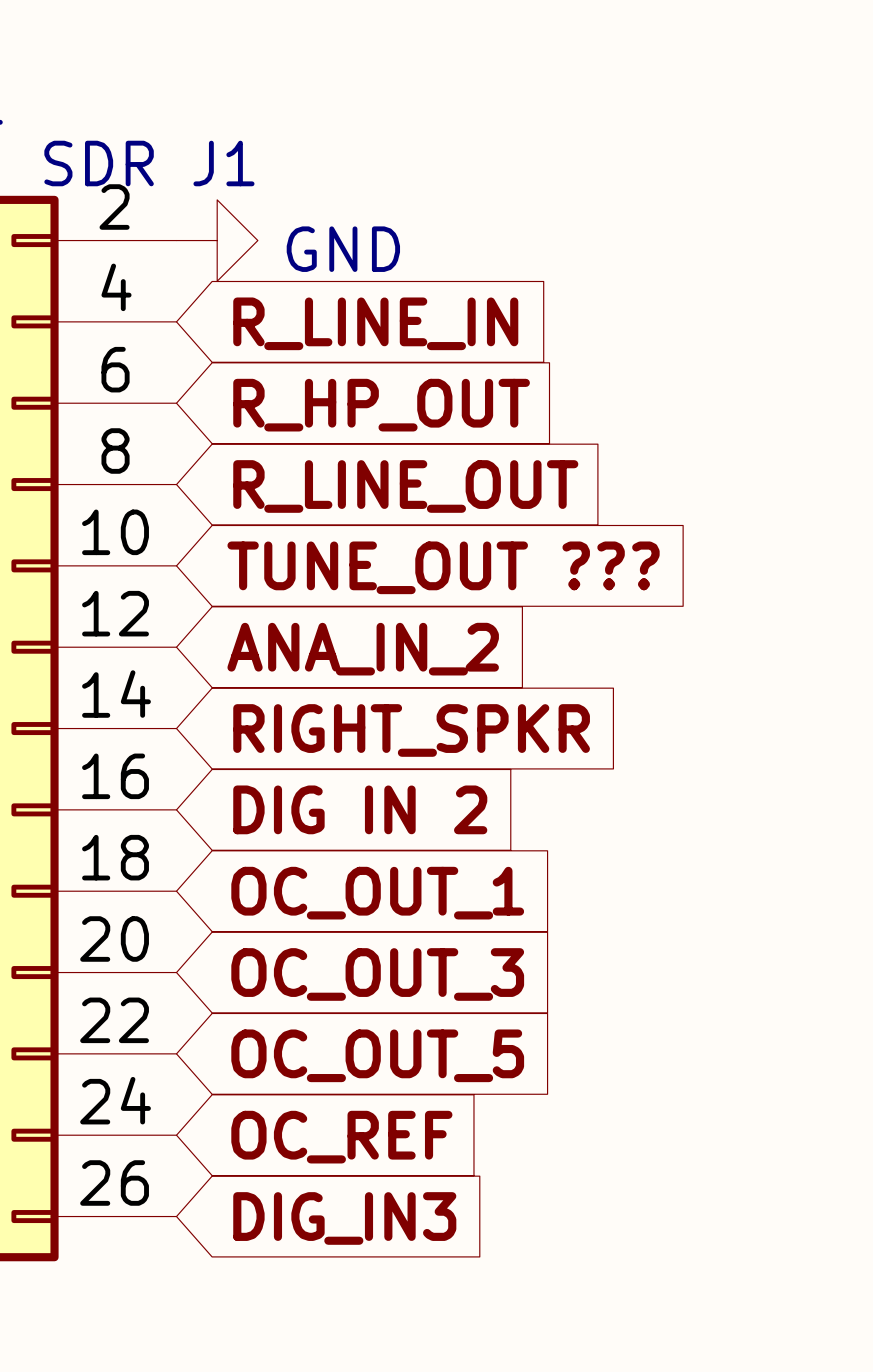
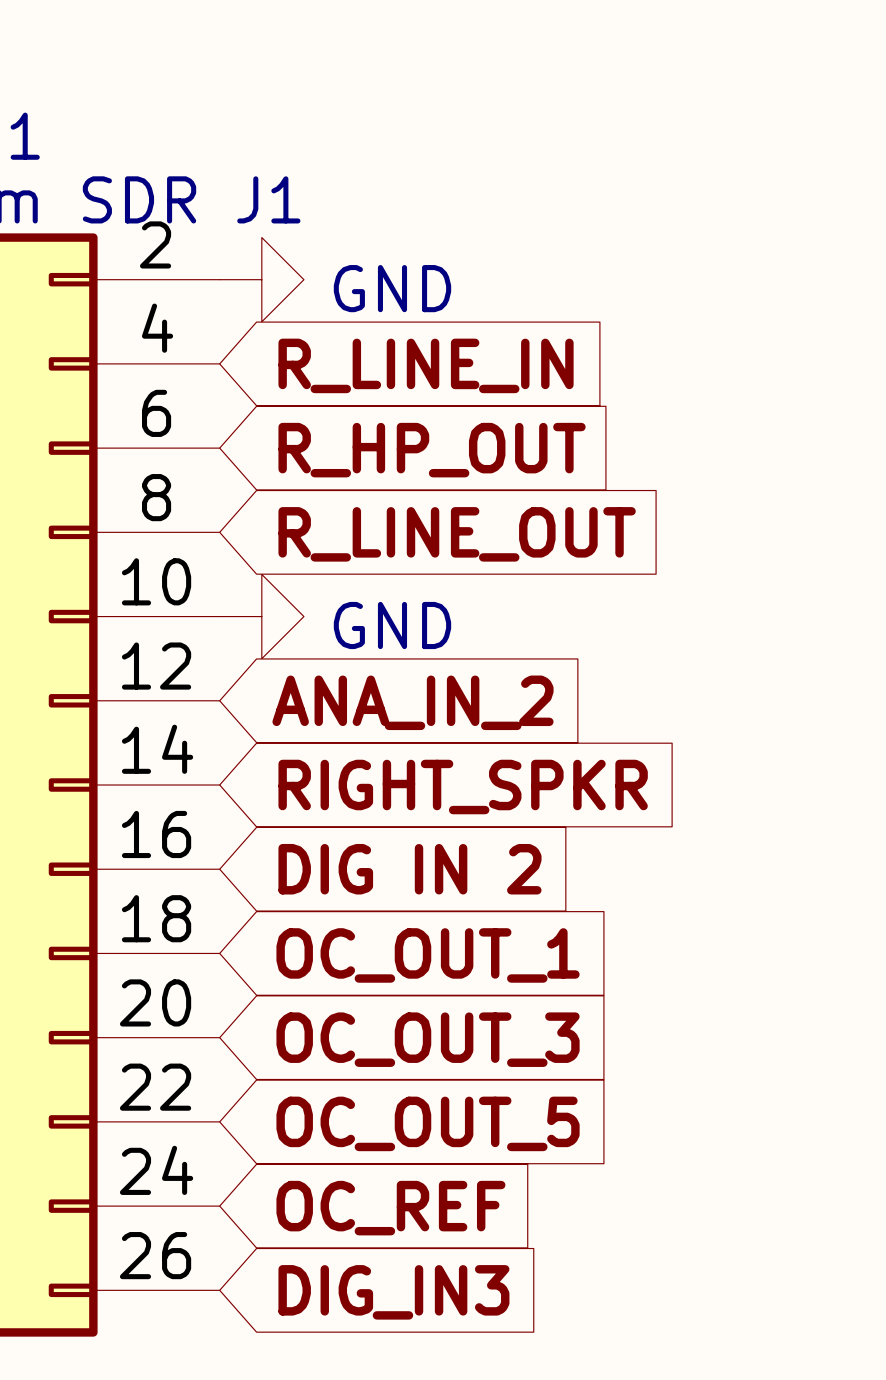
power symbol: none -> GND (261, 616)
global label: TUNE_OUT ??? (443, 567) -> none

